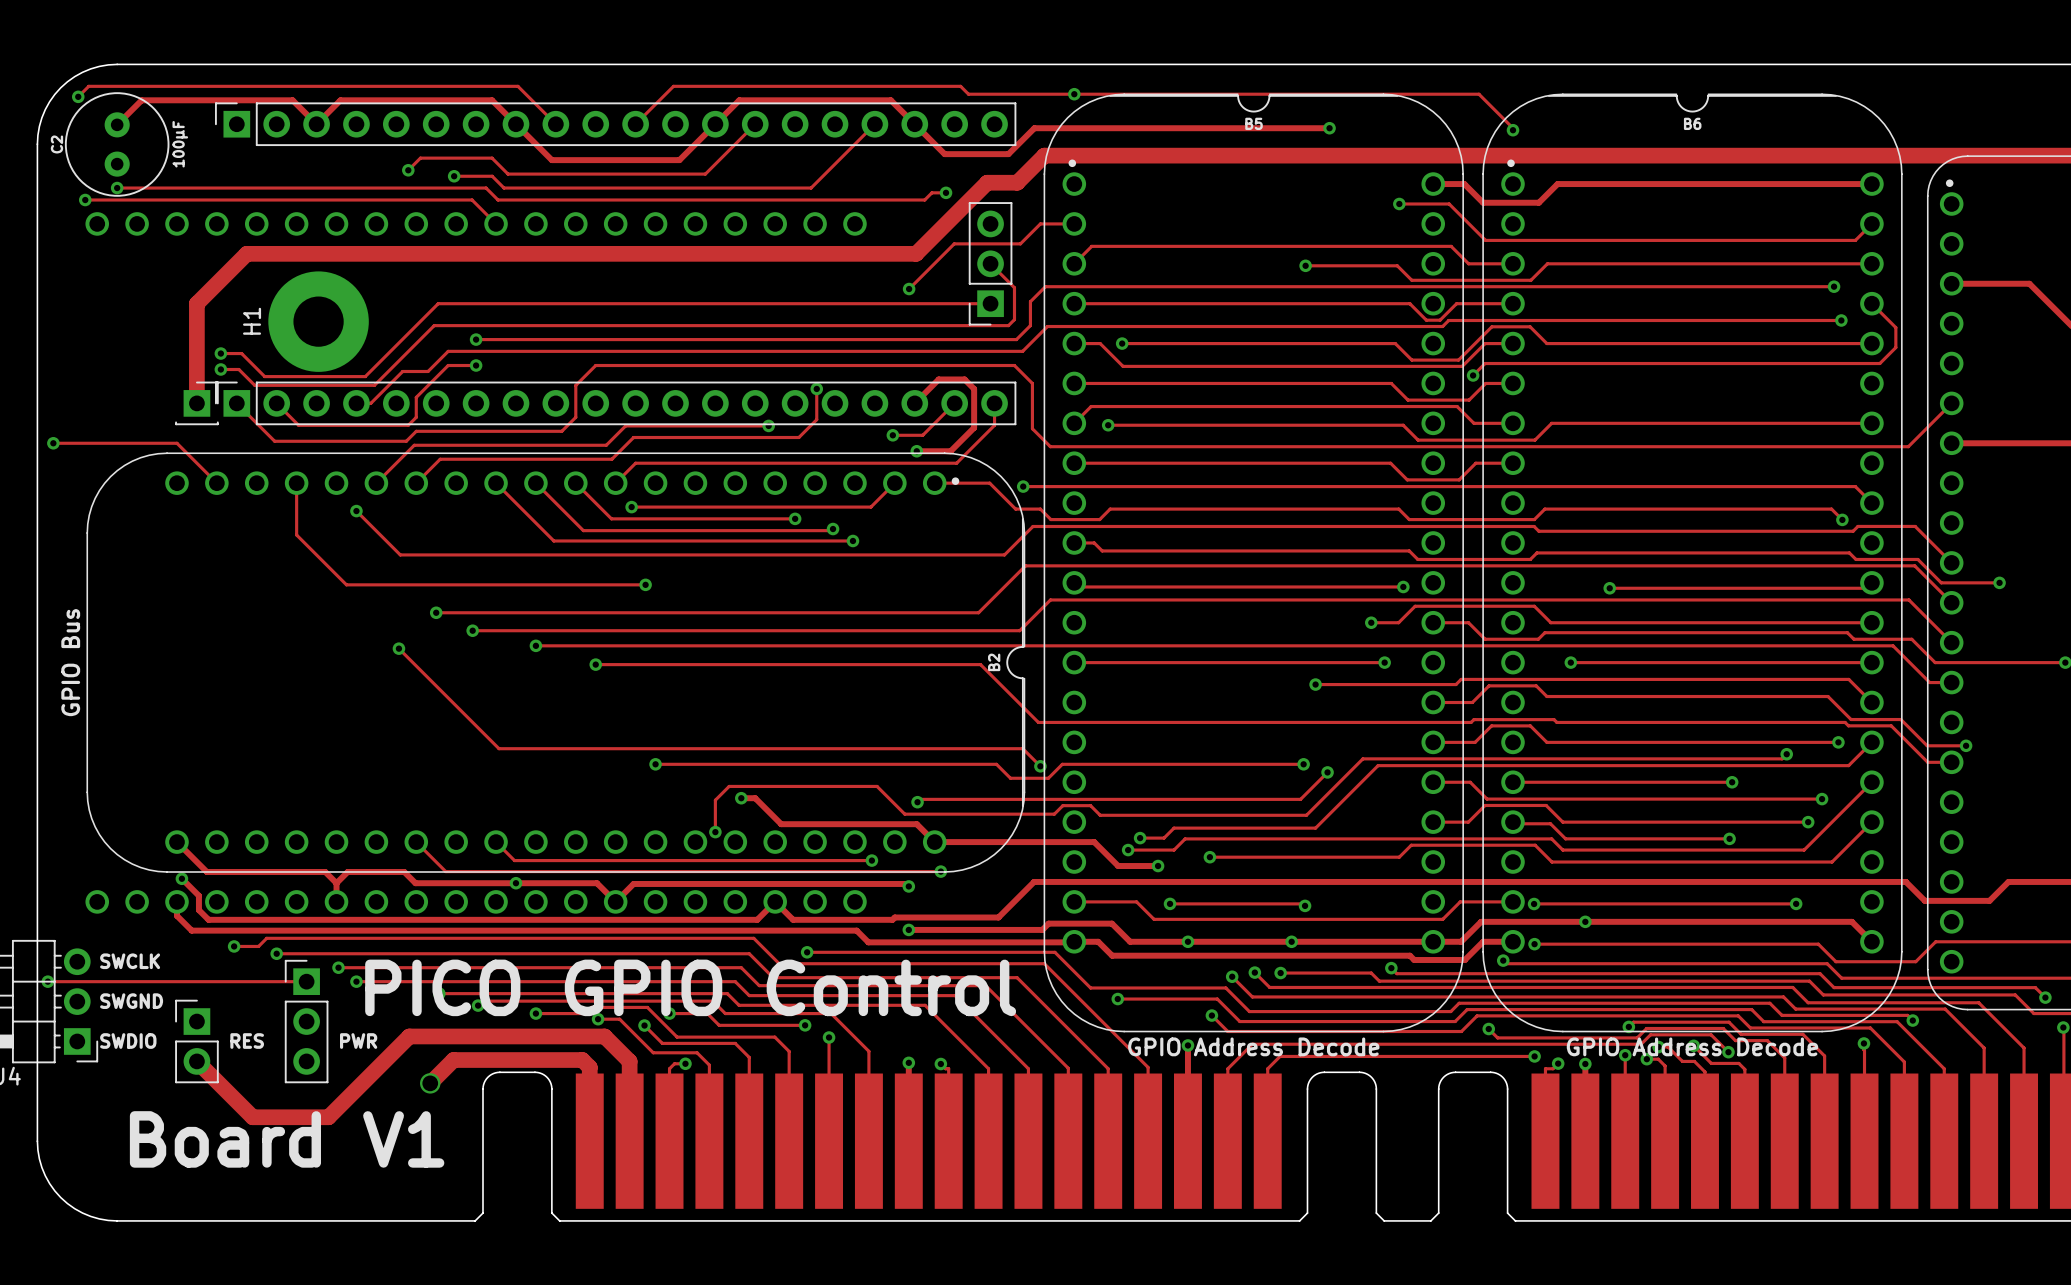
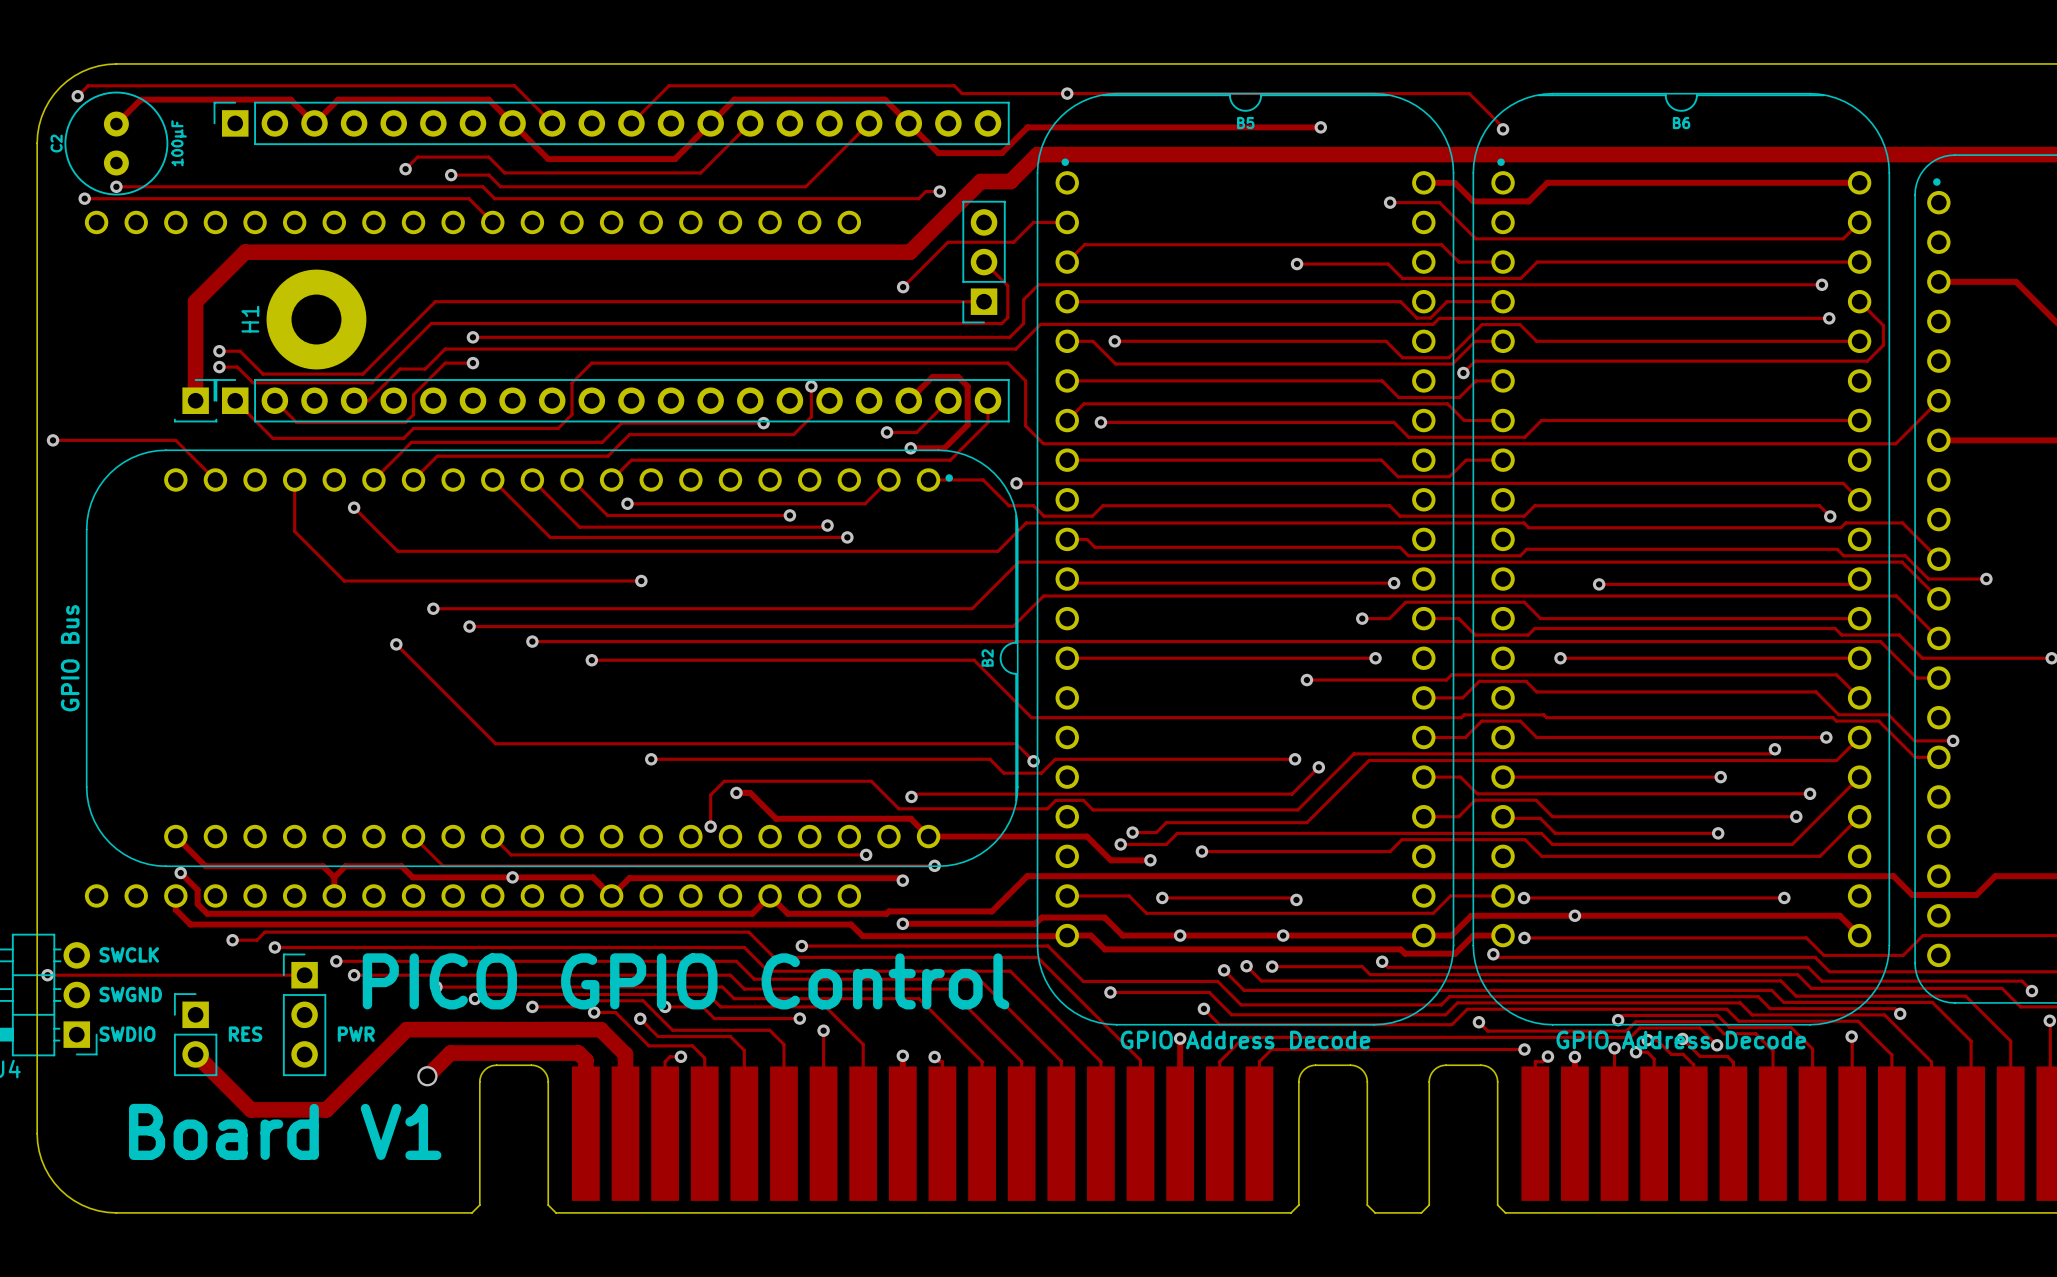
B5 footprint: [1043, 93, 1464, 1033] -> [1036, 92, 1455, 1026]
B6 footprint: [1482, 93, 1903, 1033] -> [1472, 92, 1891, 1026]
B2 footprint: [86, 452, 1026, 873] -> [85, 449, 1019, 868]

